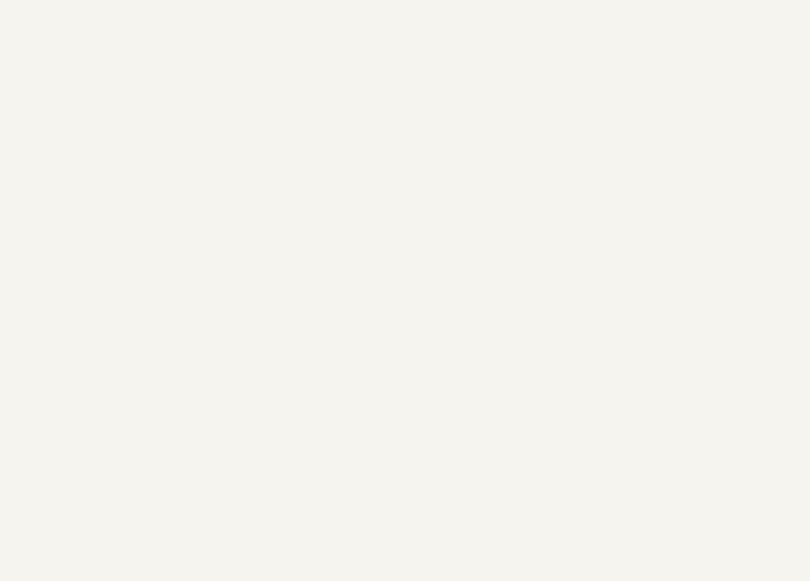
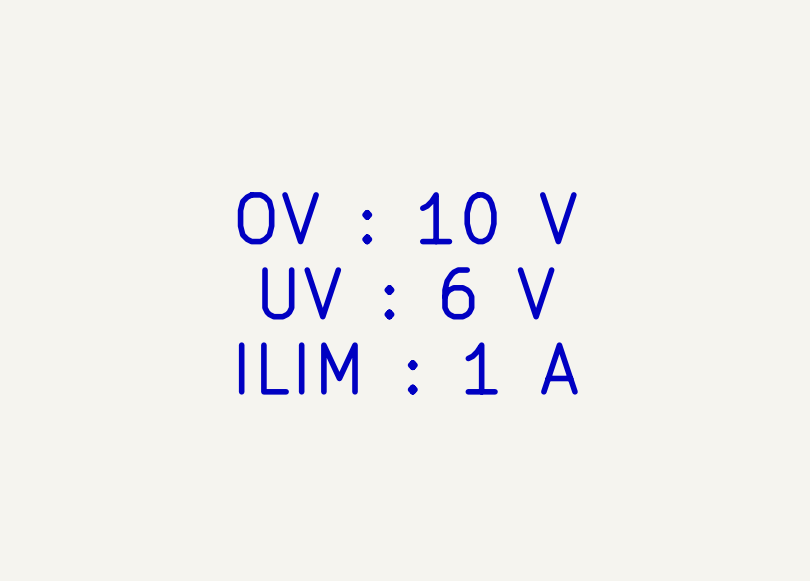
text: none -> OV : 10 V (407, 218)
text: none -> UV : 6 V (408, 293)
text: none -> ILIM : 1 A (408, 368)

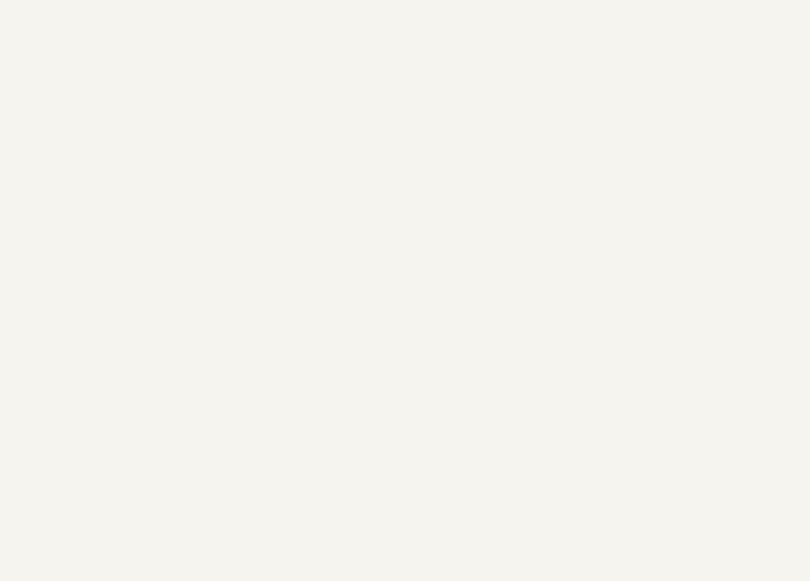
text: OV : 10 V (407, 218) -> none
text: UV : 6 V (408, 293) -> none
text: ILIM : 1 A (408, 368) -> none

